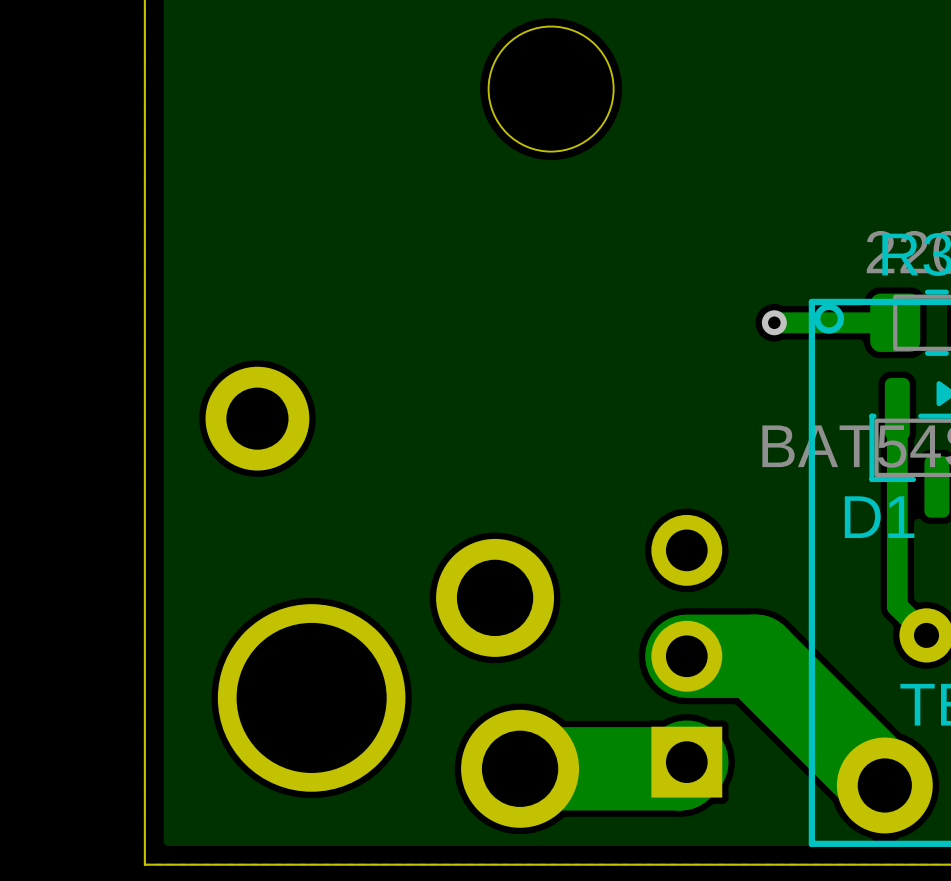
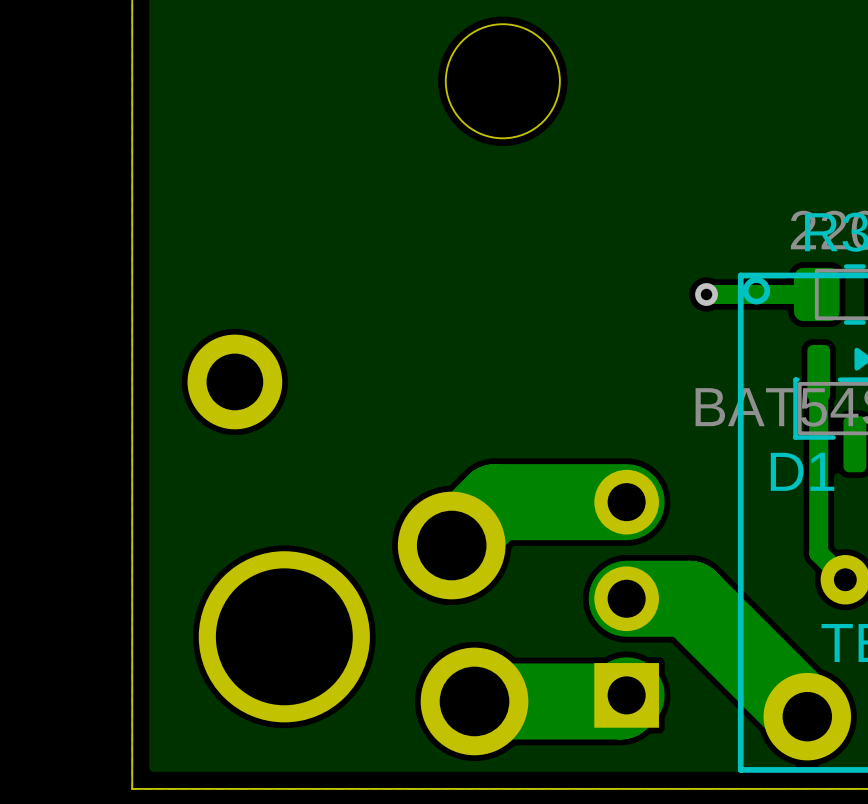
track: none -> (626, 502) (495, 502) (451, 545)

